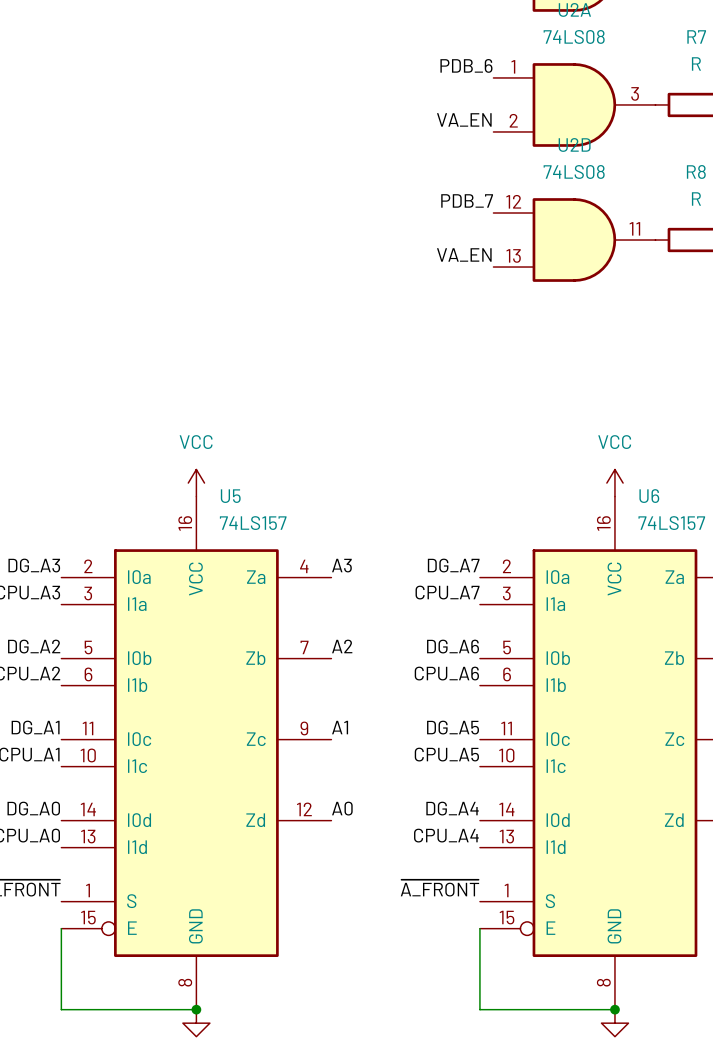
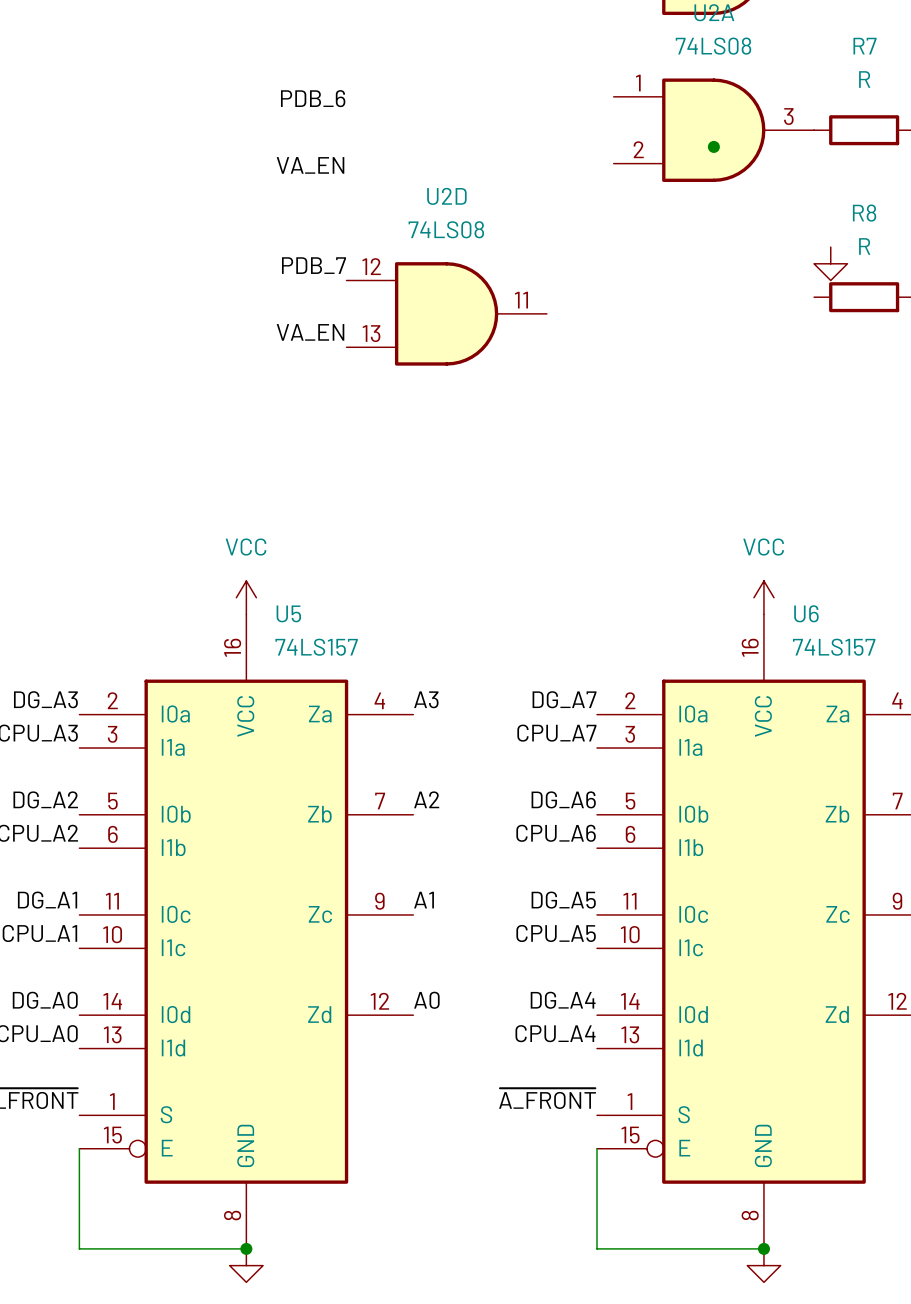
label position: PDB_6 (466, 65) -> PDB_6 (313, 98)
junction: none -> (713, 146)
label: VA_EN (464, 119) -> none
label: none -> VA_EN (310, 165)
label position: PDB_7 (467, 200) -> PDB_7 (314, 265)
power symbol: none -> (830, 263)
U2D position: (574, 240) -> (446, 313)
label: VA_EN (464, 254) -> none
label: none -> VA_EN (310, 332)

